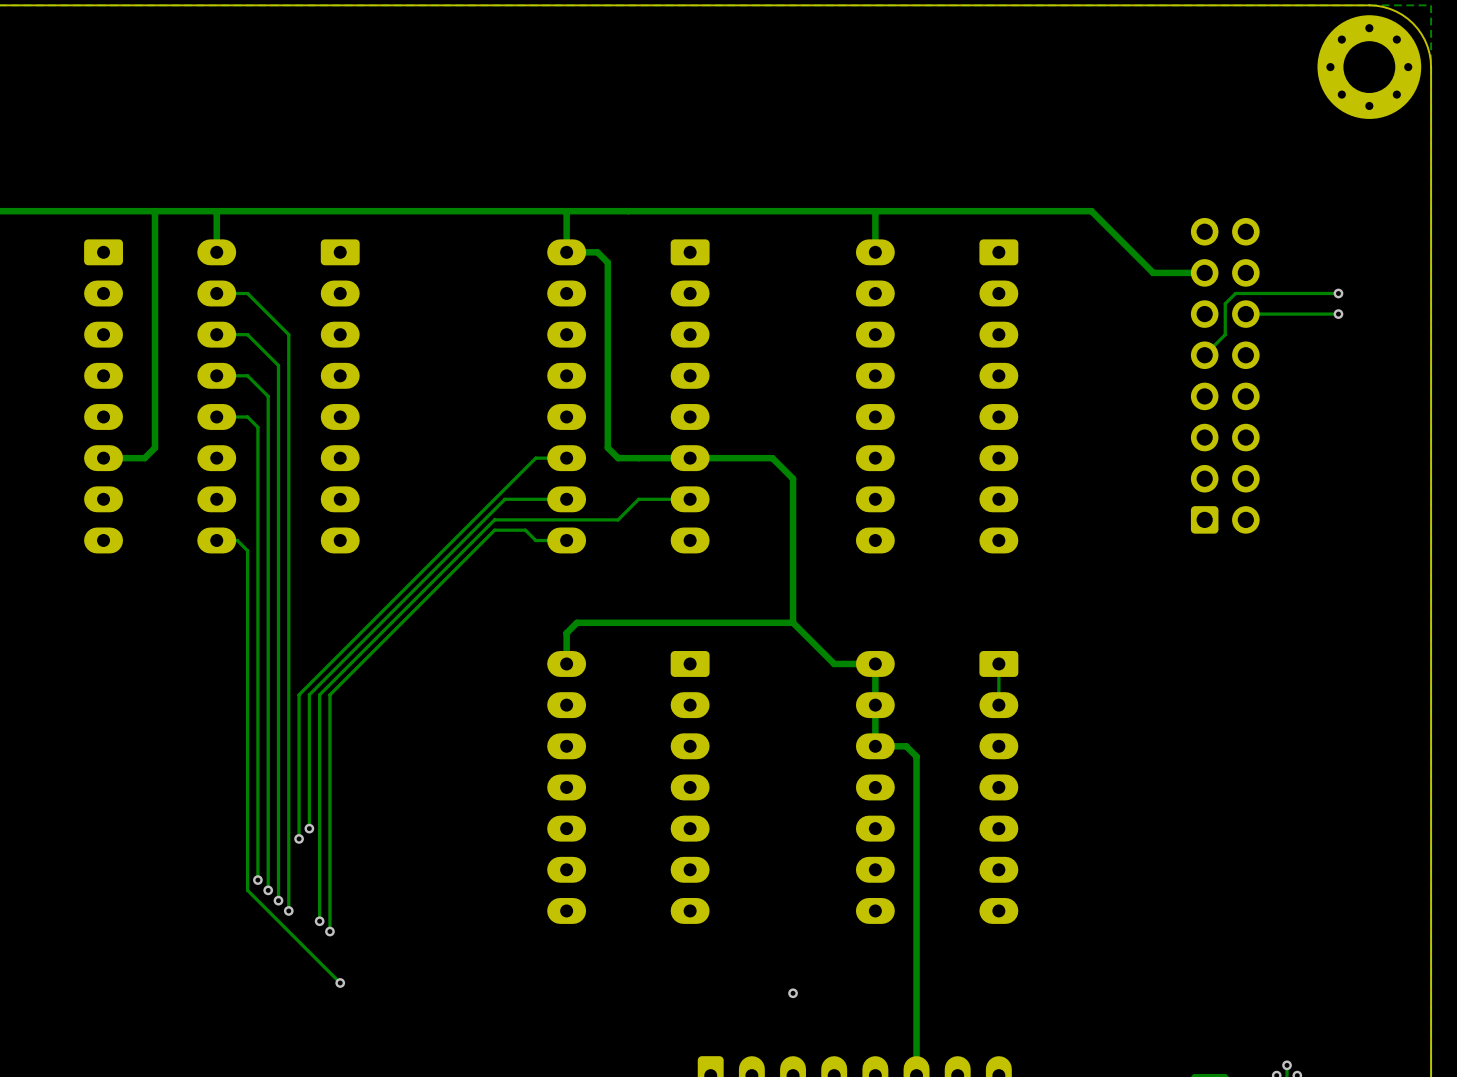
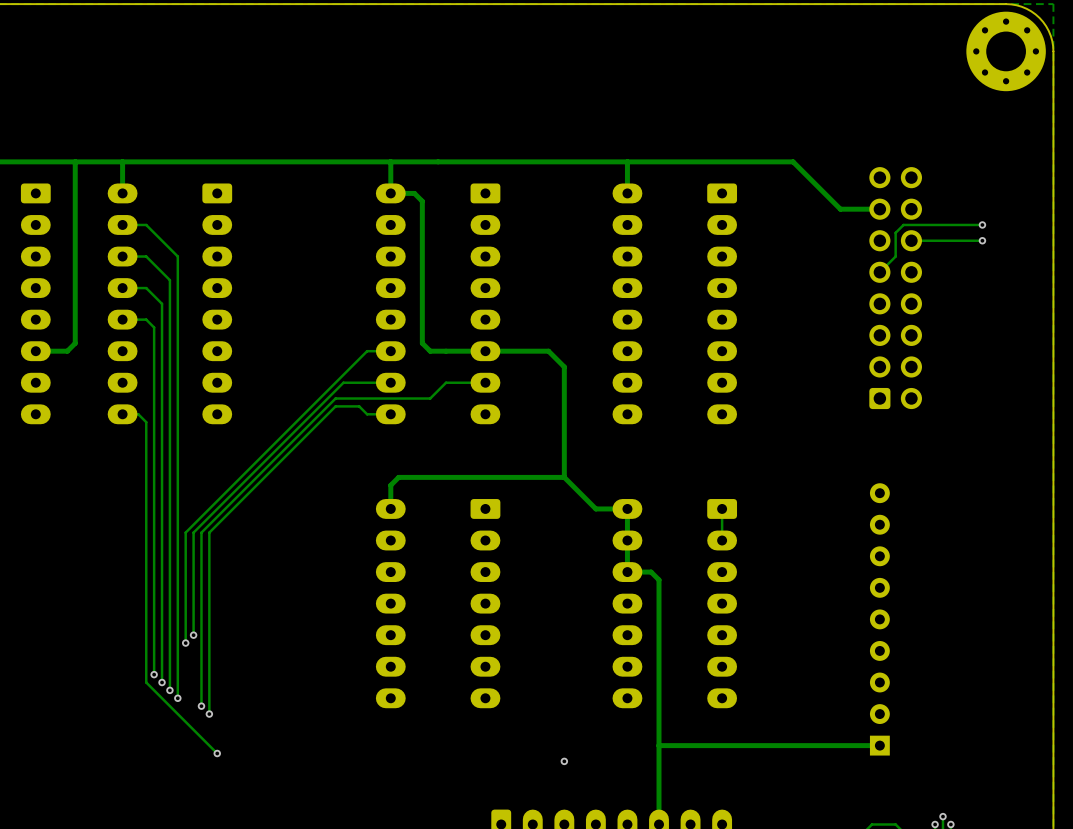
part: none -> (879, 619)
track: none -> (879, 745) (659, 745)

